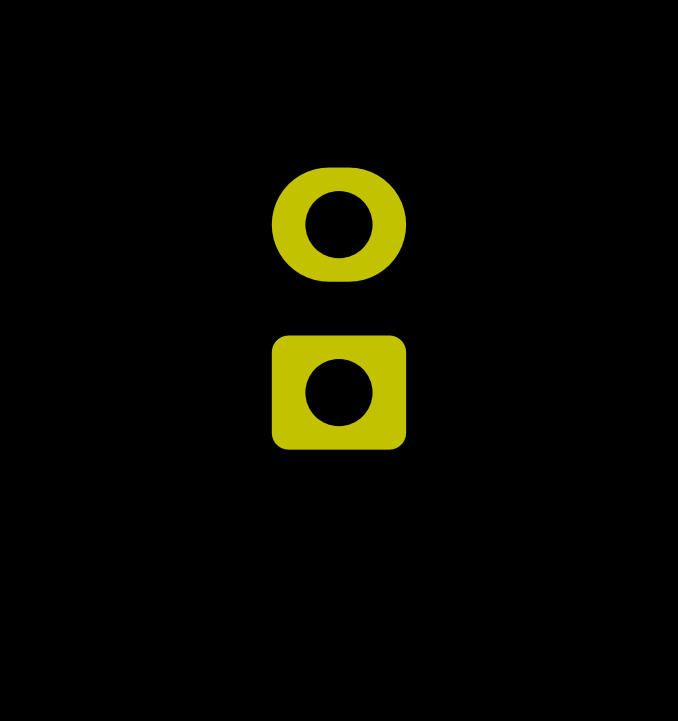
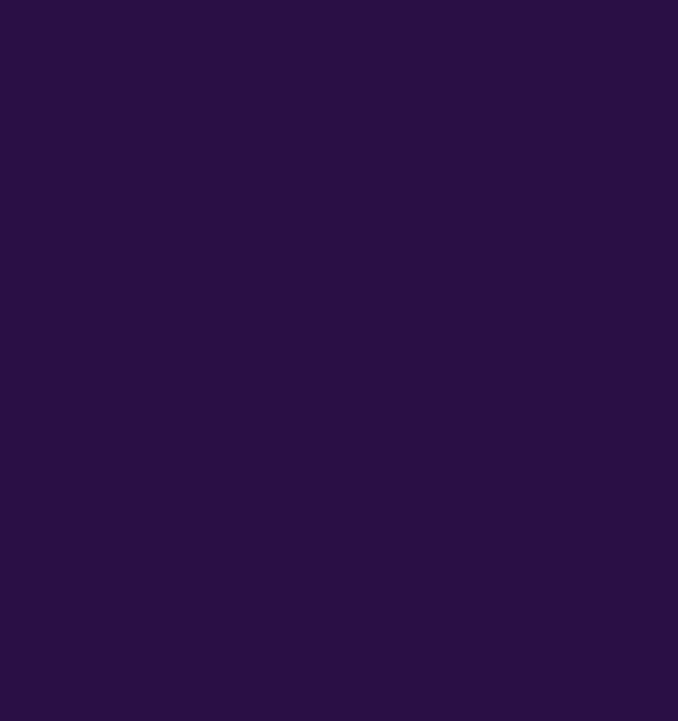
part: (338, 308) -> none

